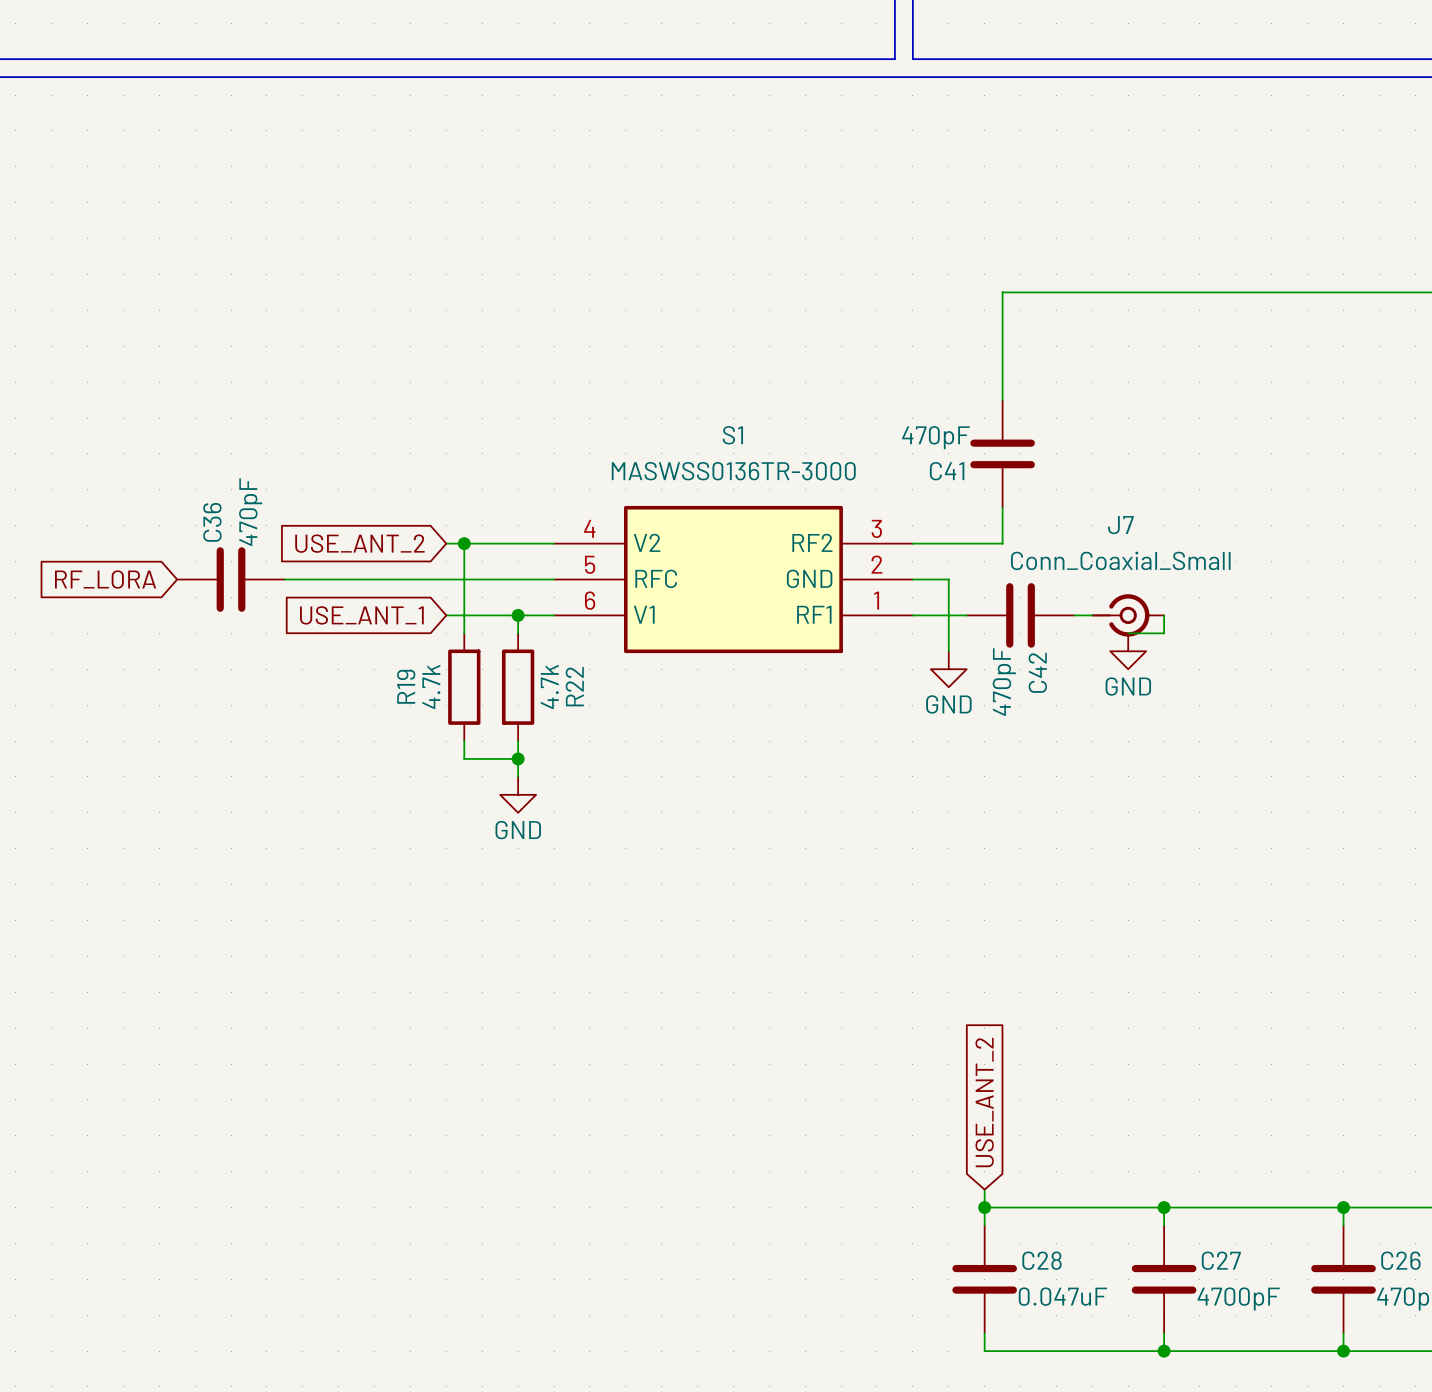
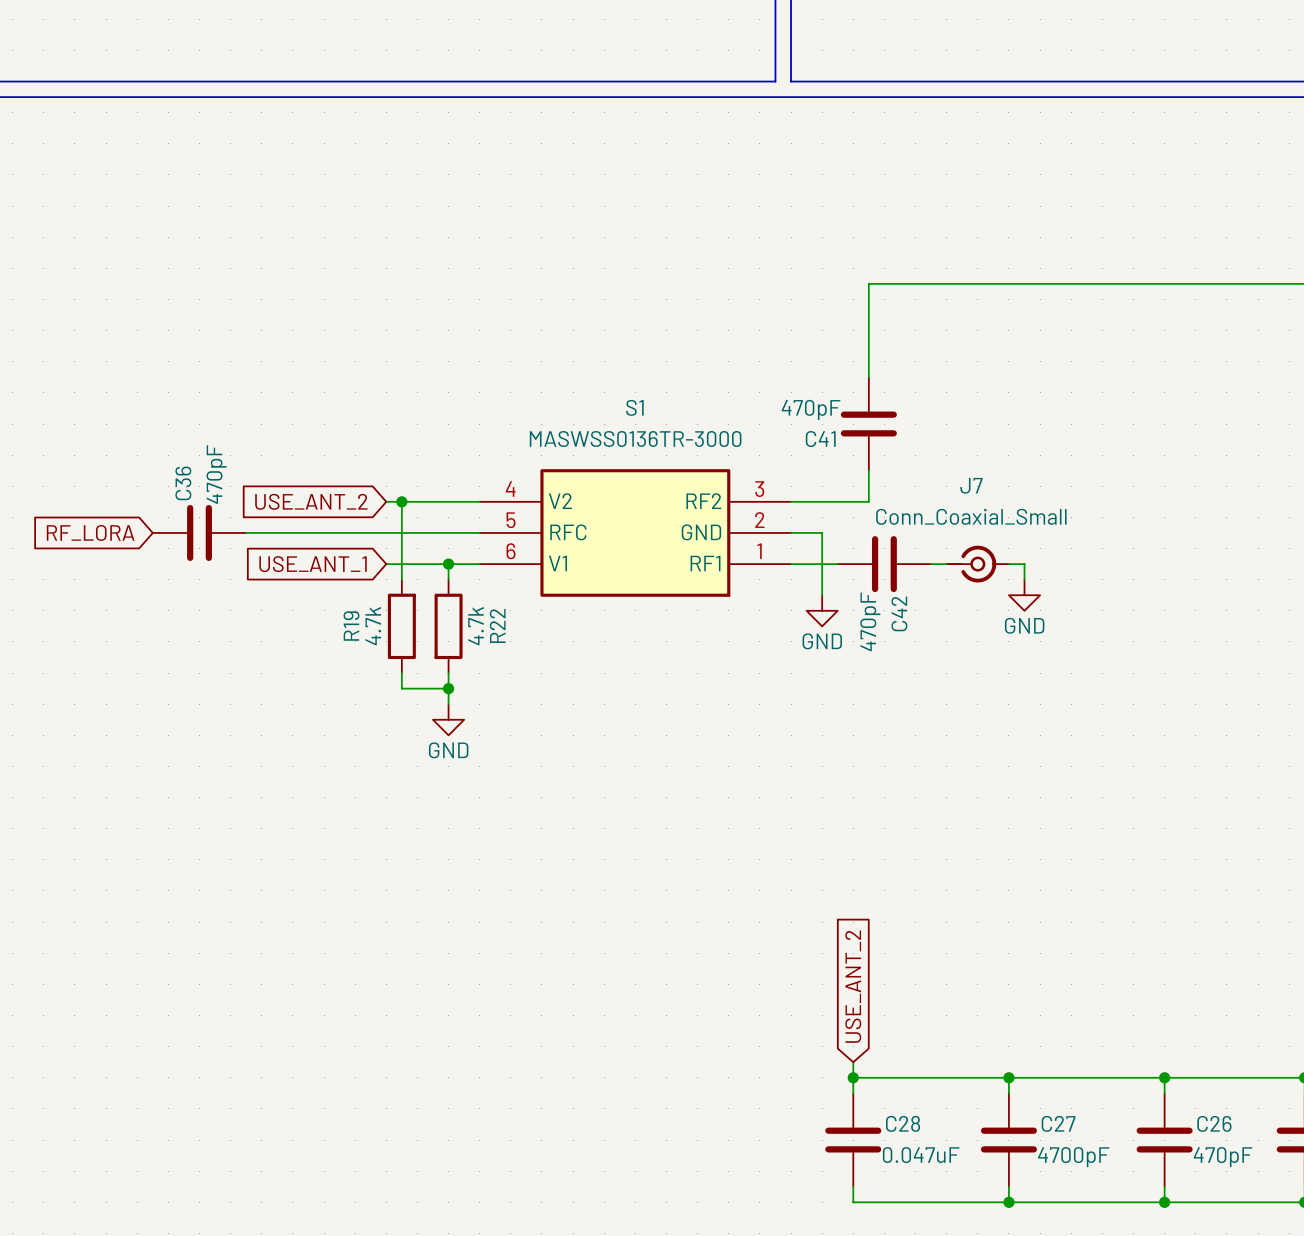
wire: (1164, 615) (1164, 633) (1128, 633) -> (1008, 564) (1024, 564) (1024, 579)
power symbol position: GND (1128, 651) -> GND (1024, 595)

